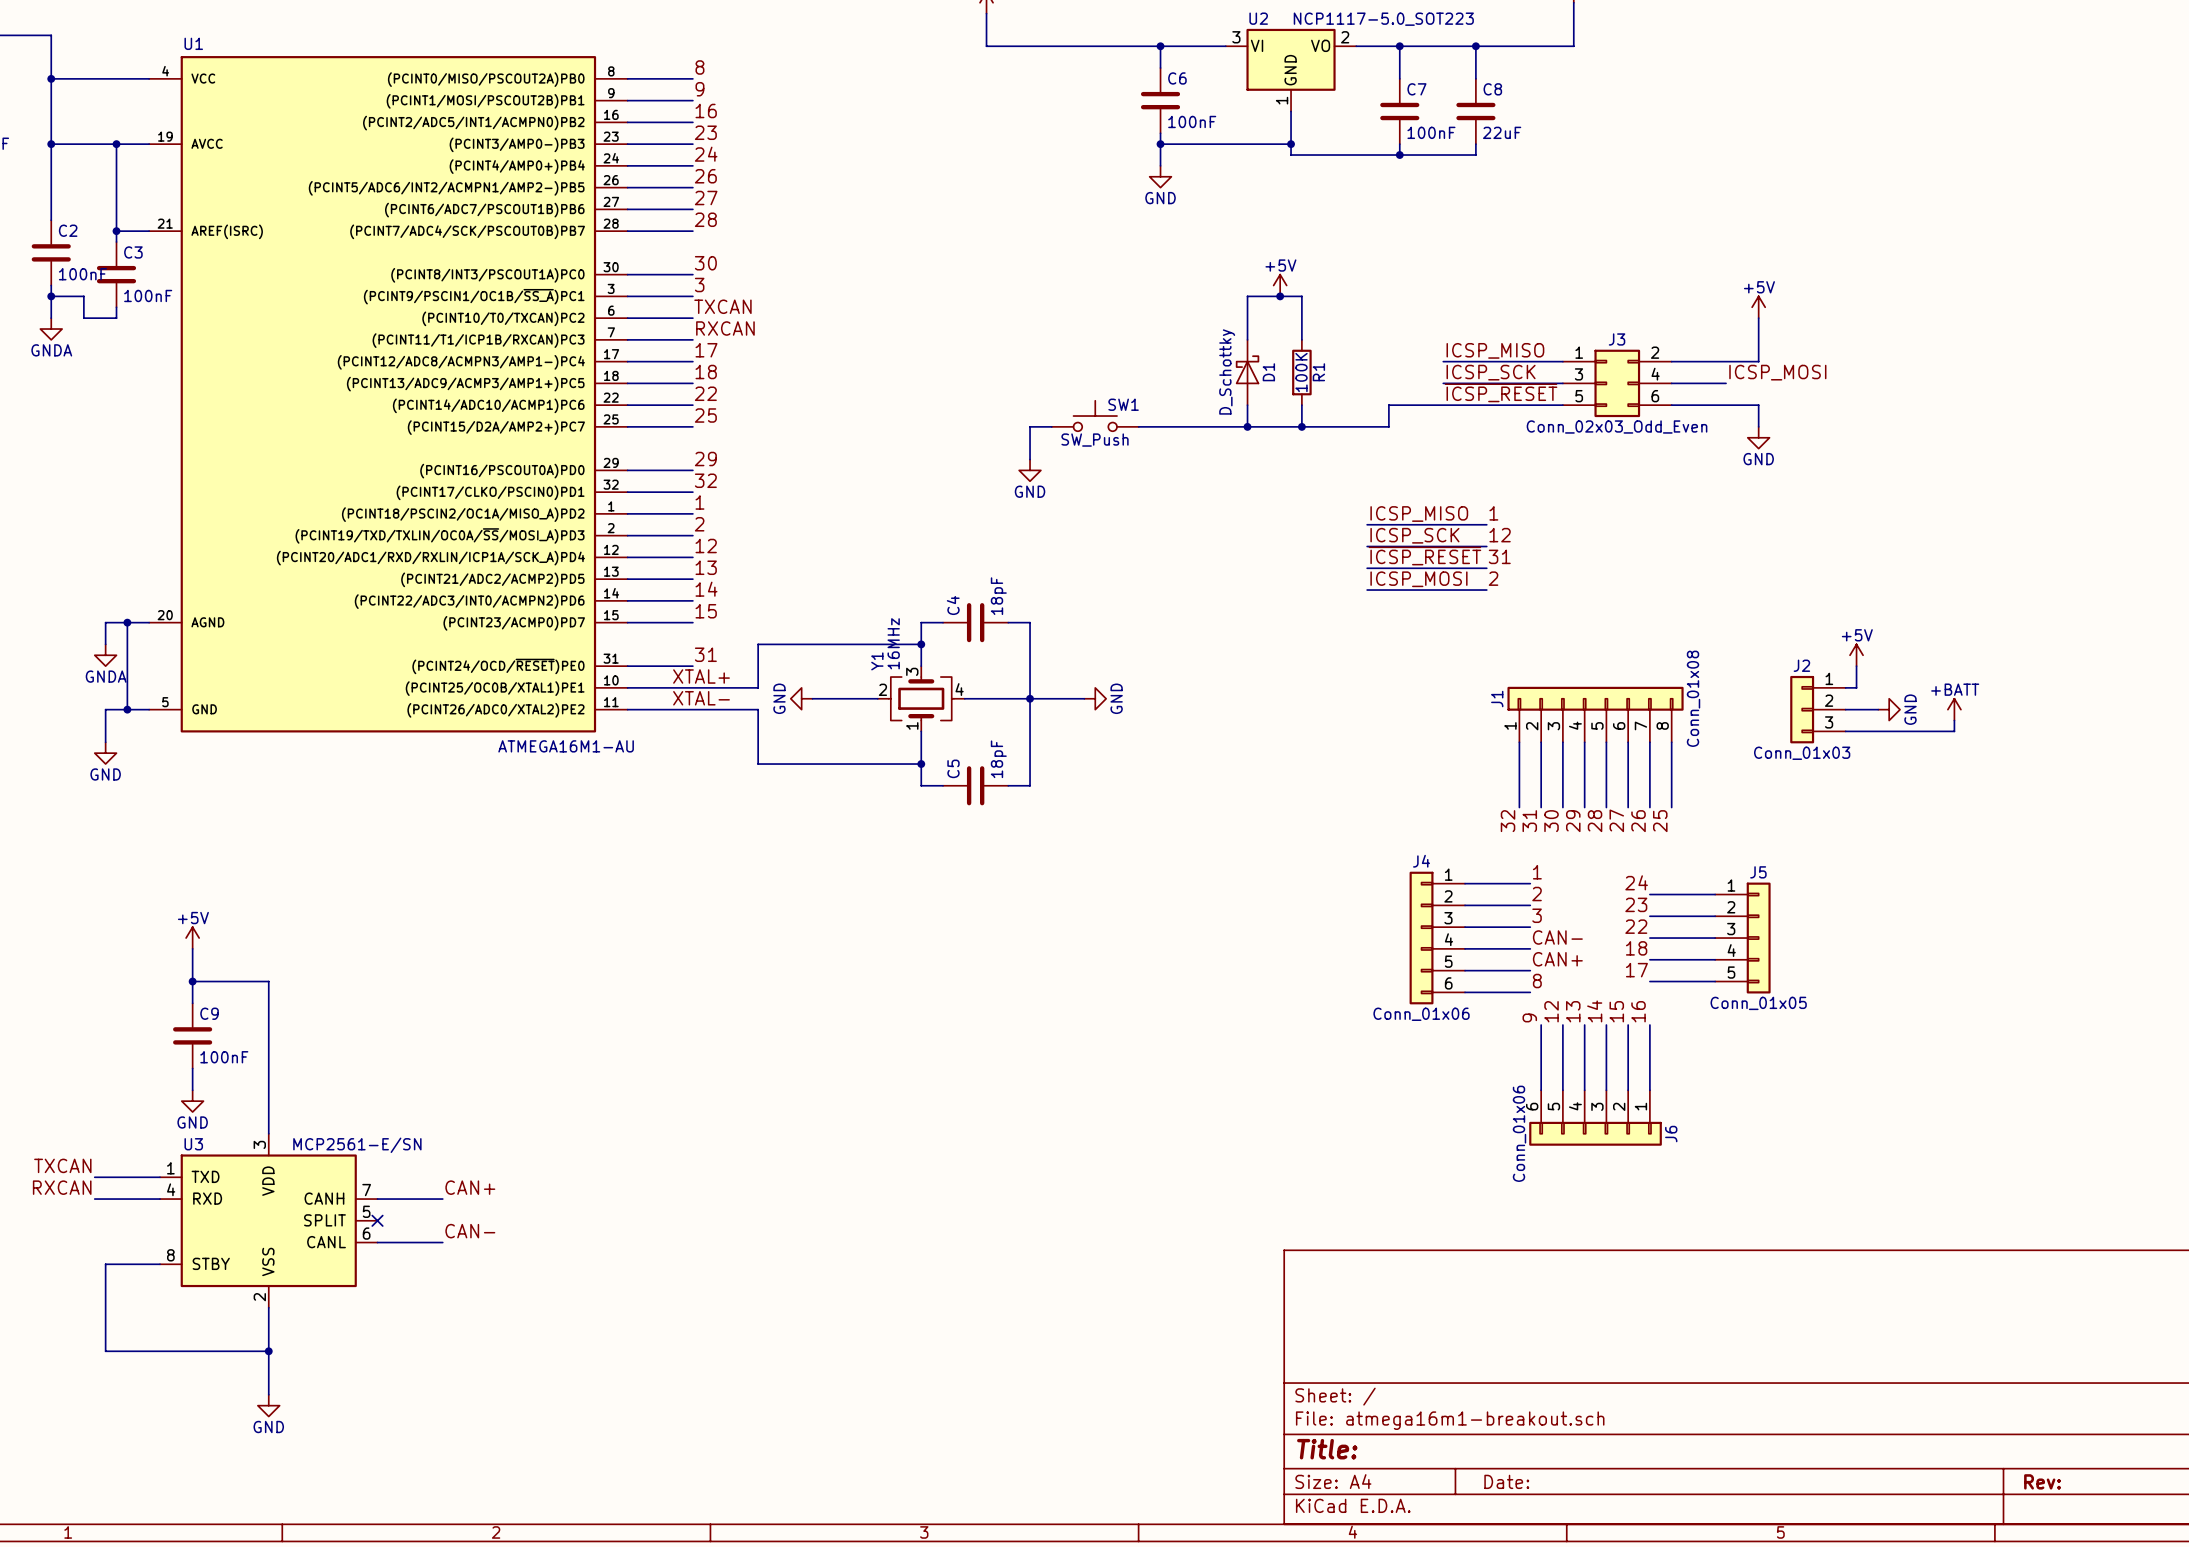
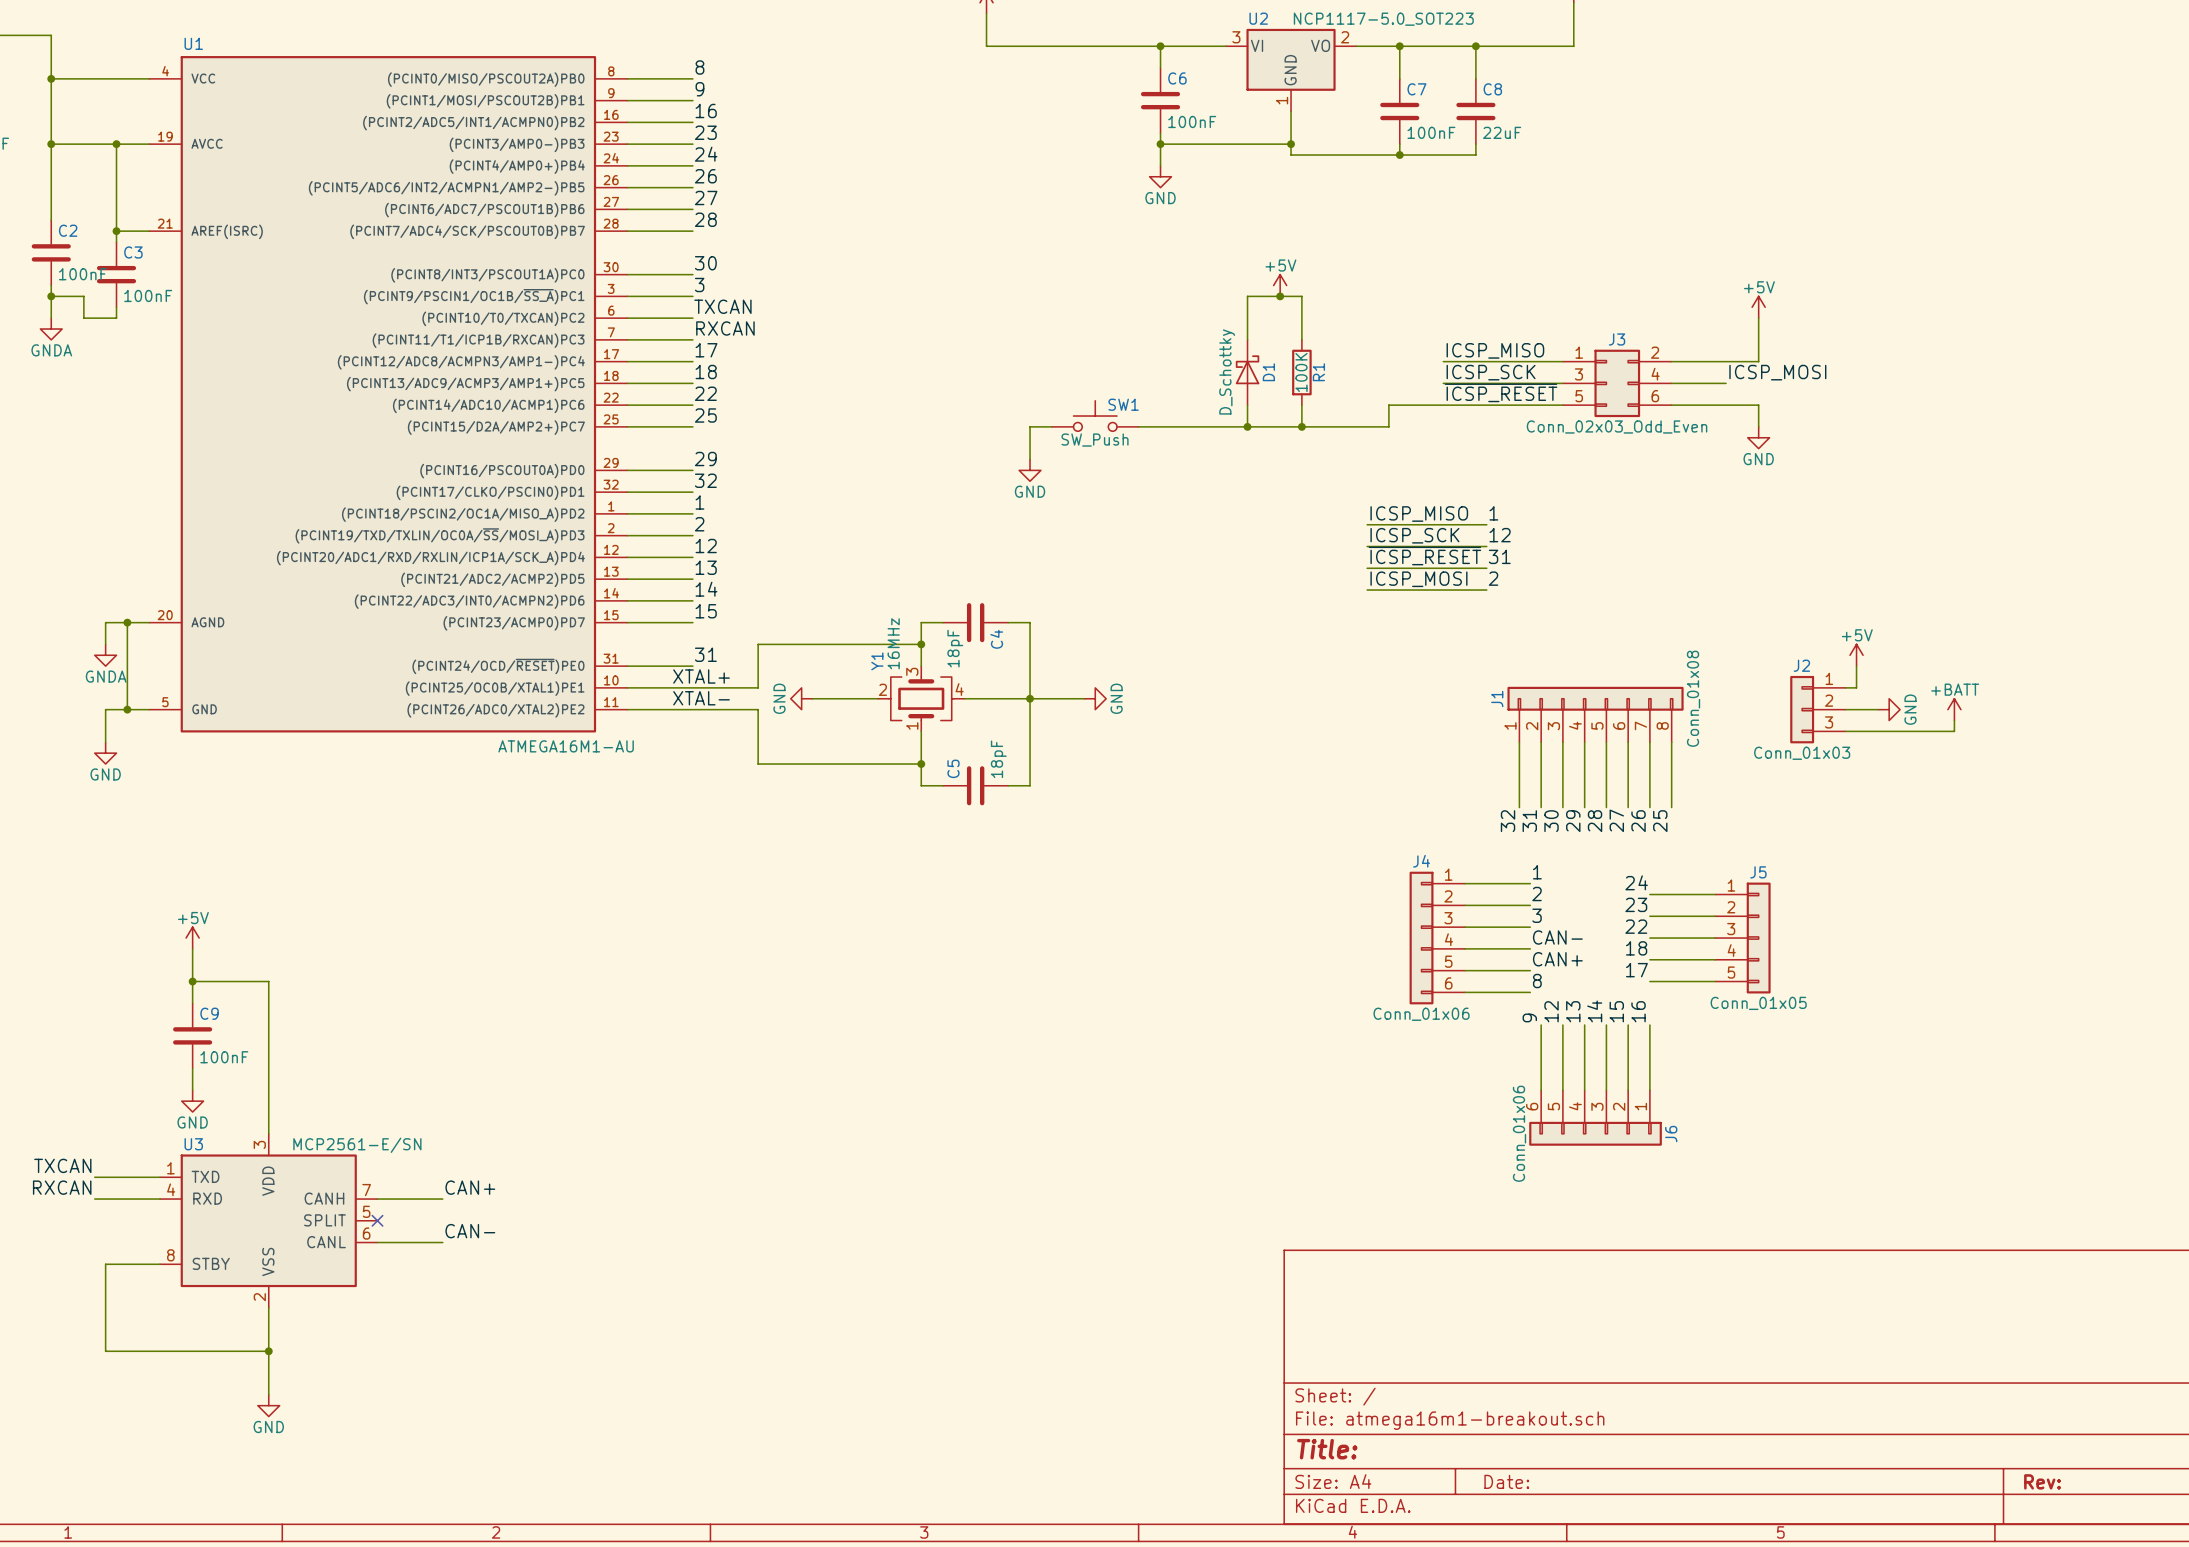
C4 value position: 18pF (998, 596) -> 18pF (955, 648)
C4 name position: C4 (953, 605) -> C4 (996, 639)

